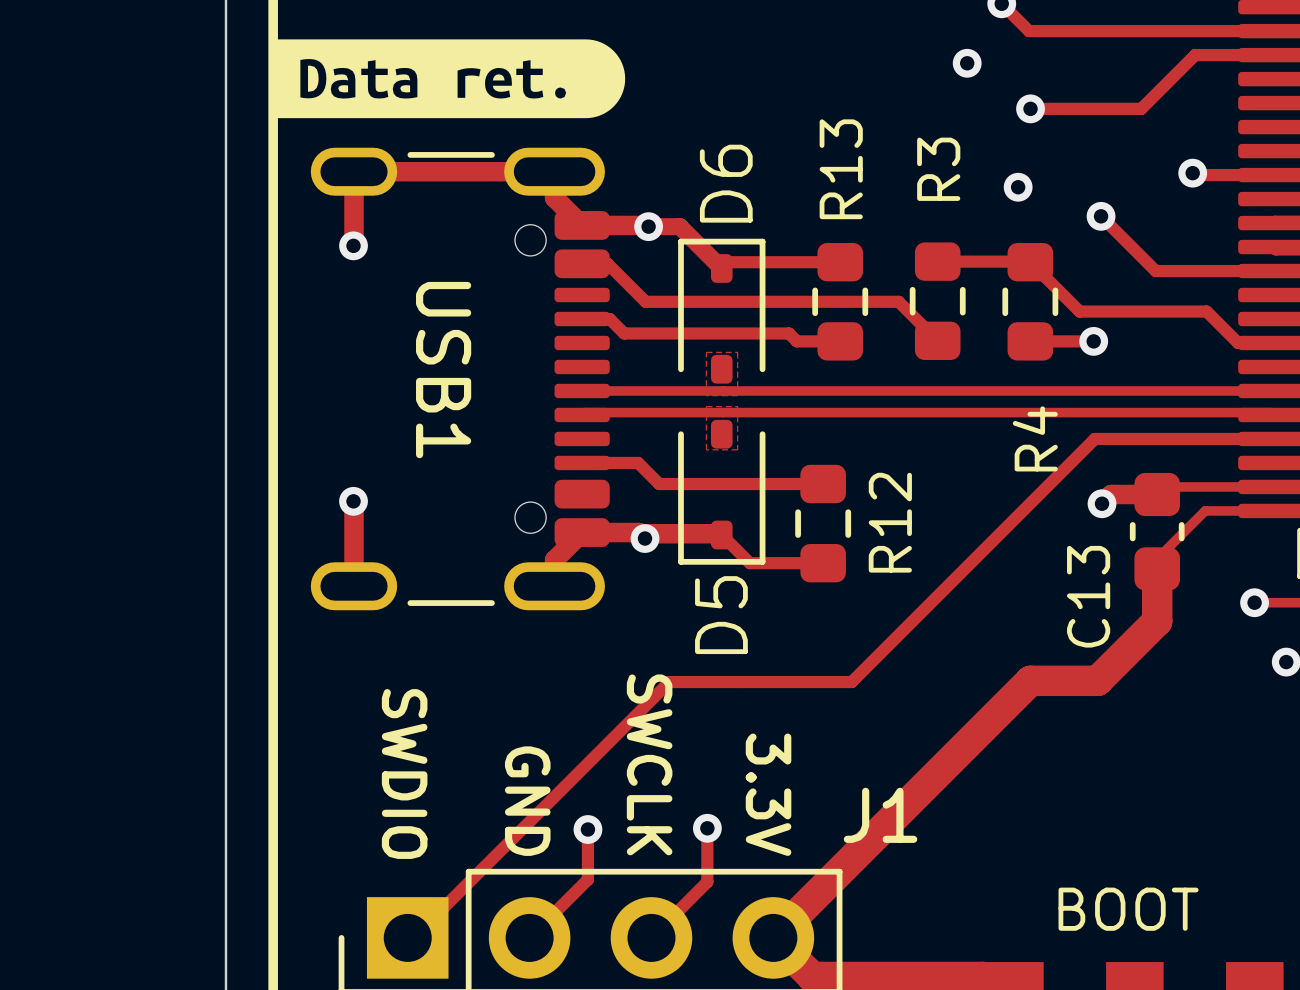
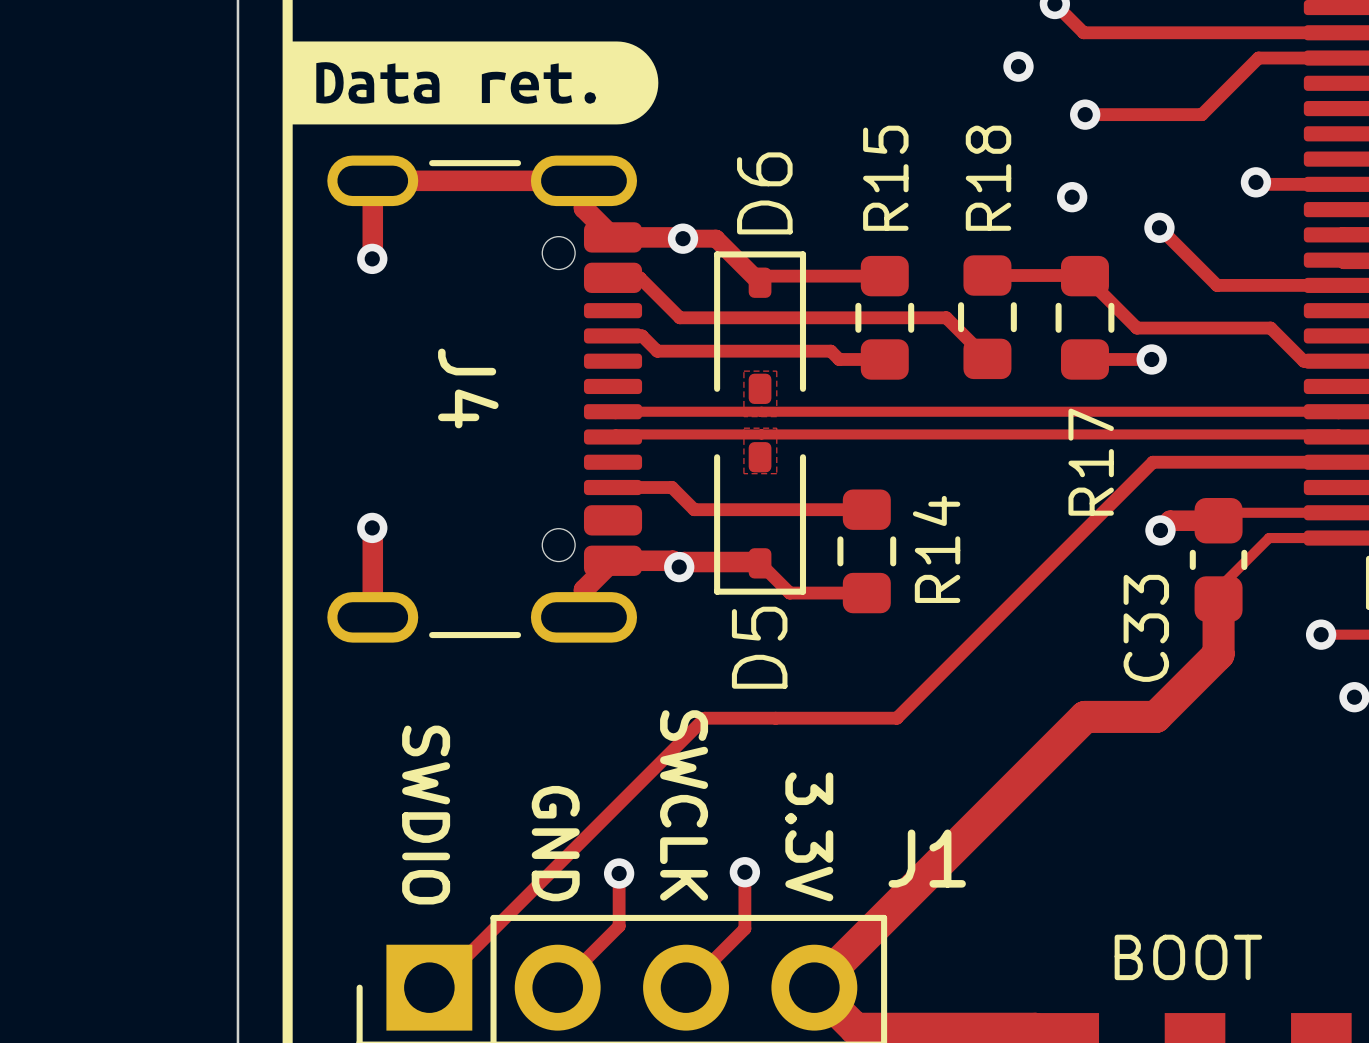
R13 name: R13 (841, 169) -> R15 (885, 178)
R3 name: R3 (938, 169) -> R18 (988, 178)
USB1 name: USB1 (443, 370) -> J4 (468, 388)
R4 name: R4 (1035, 438) -> R17 (1091, 462)
R12 name: R12 (890, 522) -> R14 (936, 549)
C13 name: C13 (1088, 596) -> C33 (1146, 628)

